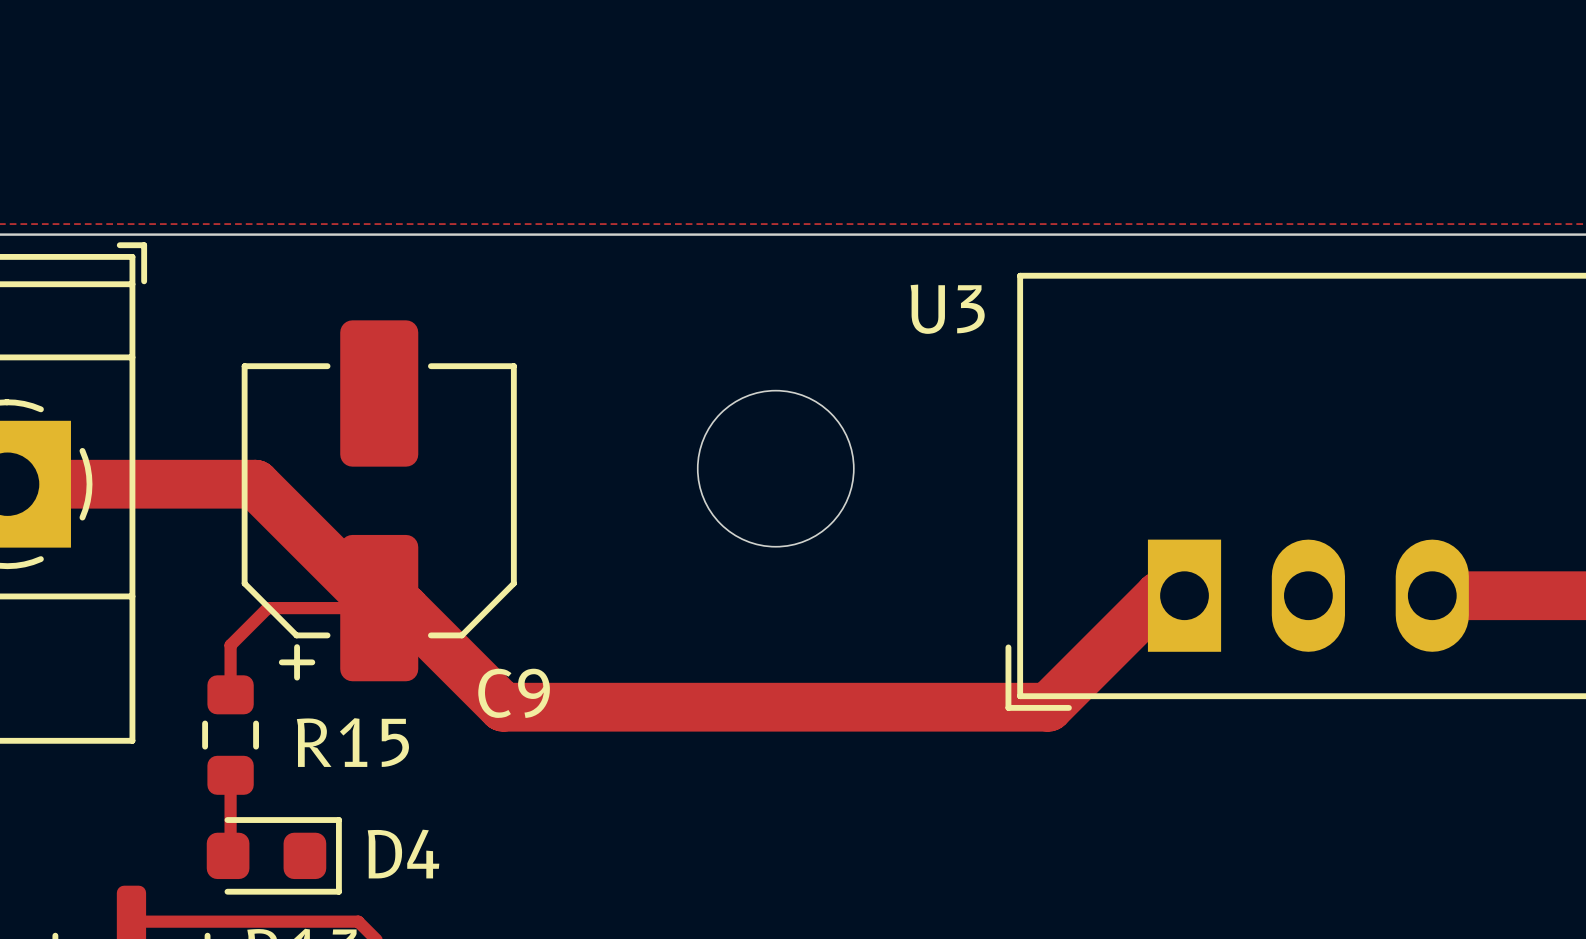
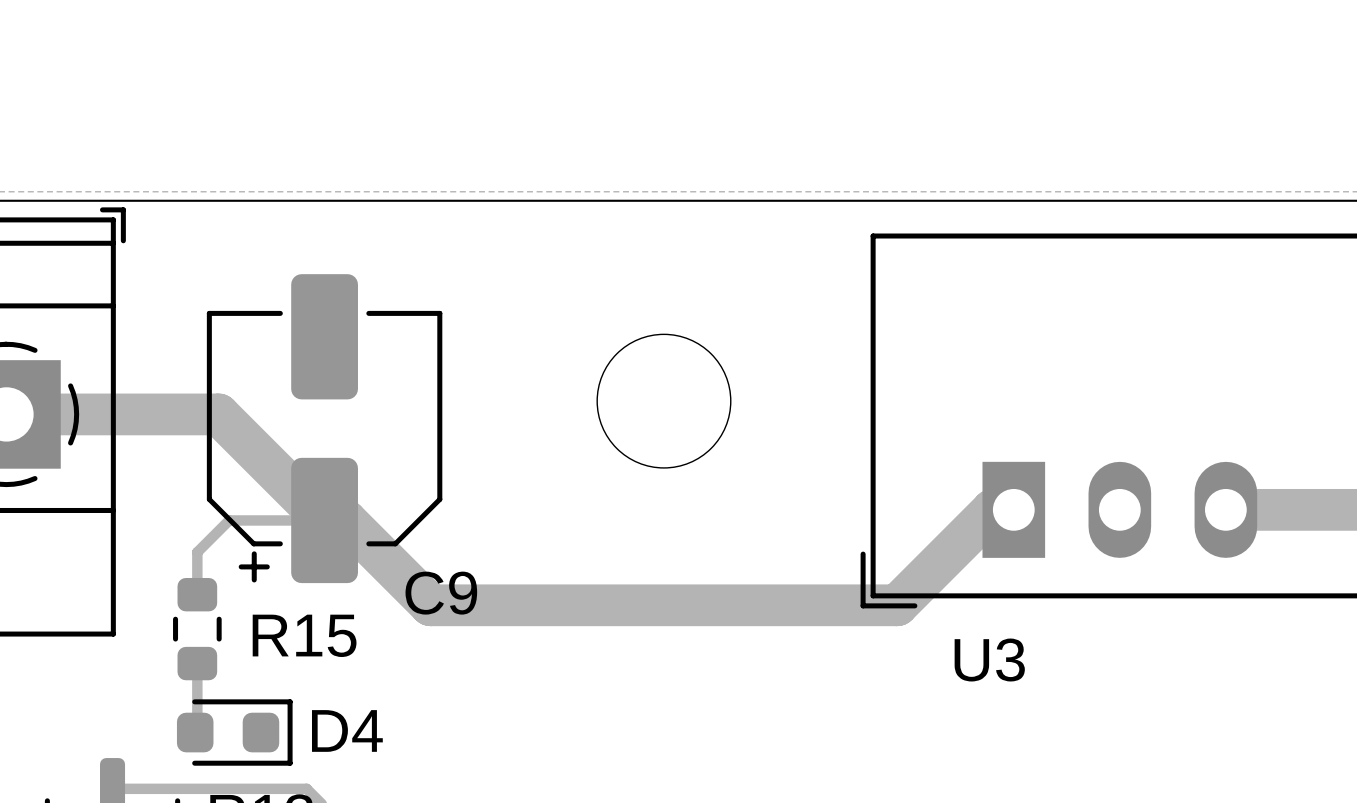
U3 name position: U3 (947, 309) -> U3 (989, 660)

